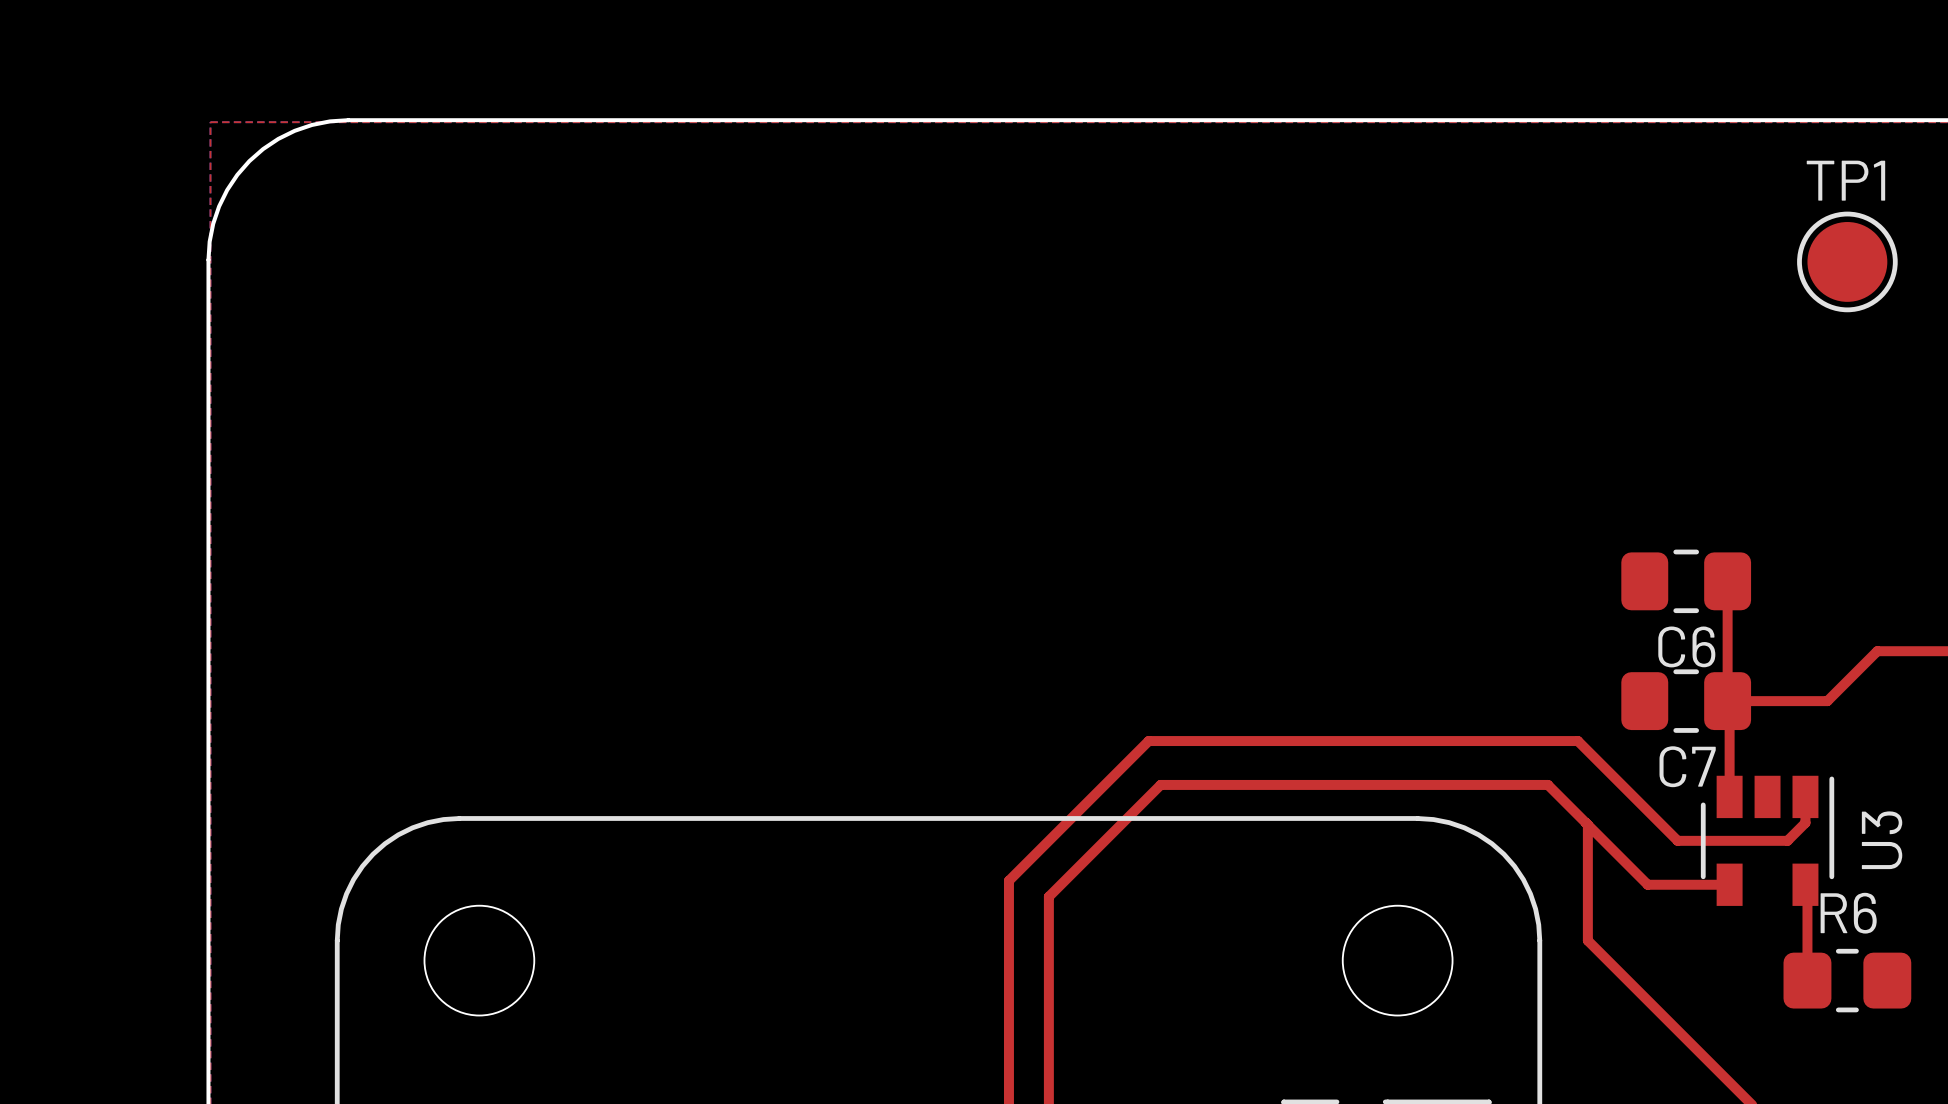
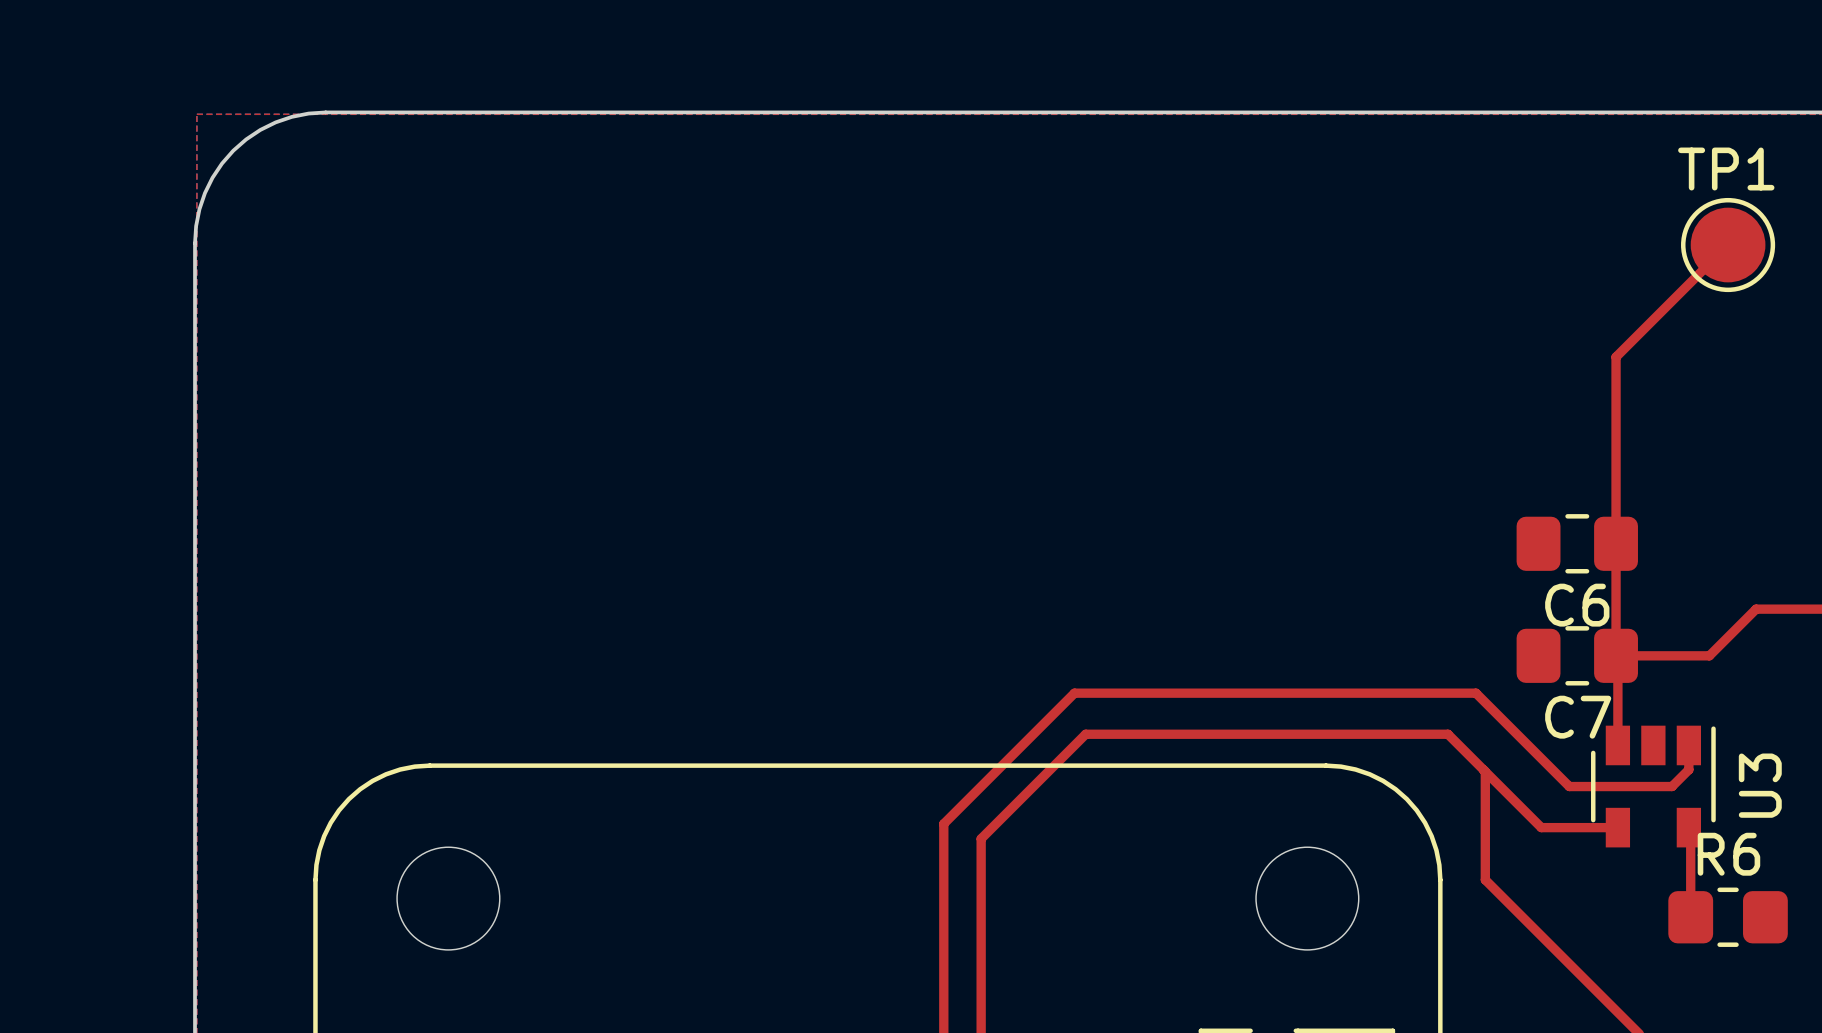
top track: none -> (1728, 245) (1616, 357) (1616, 543)

